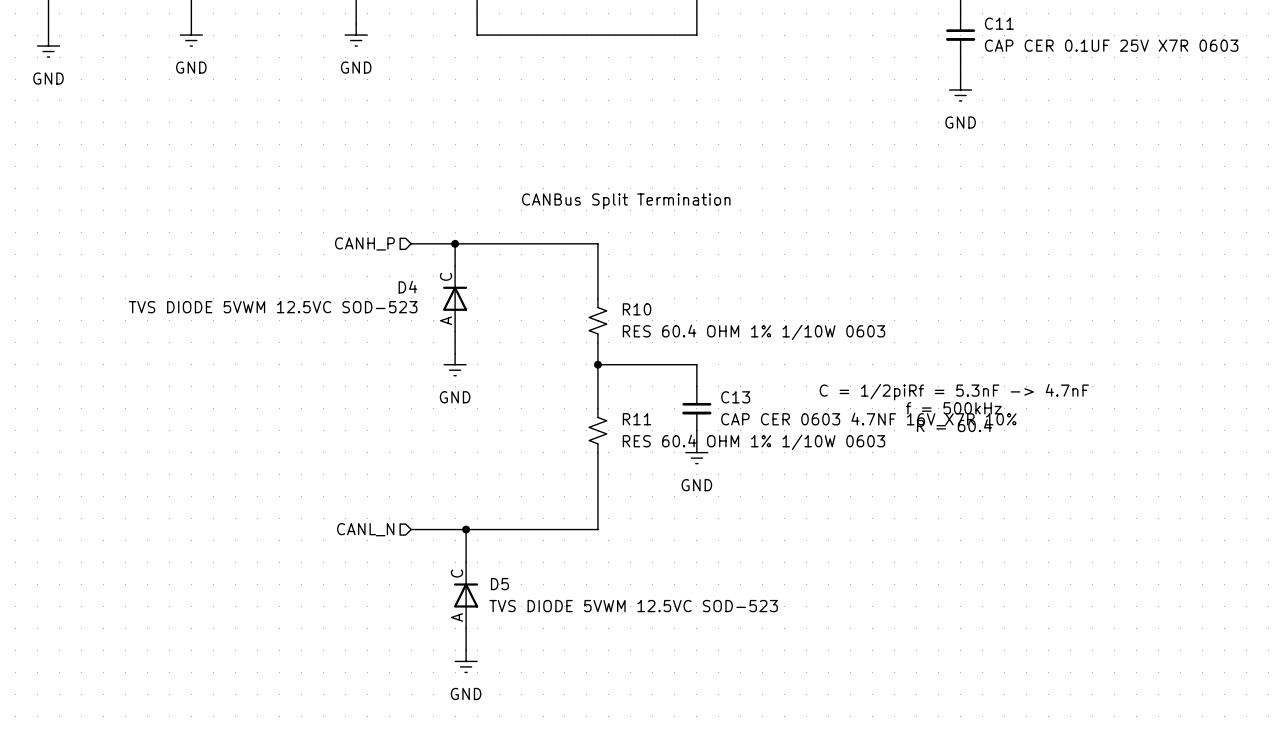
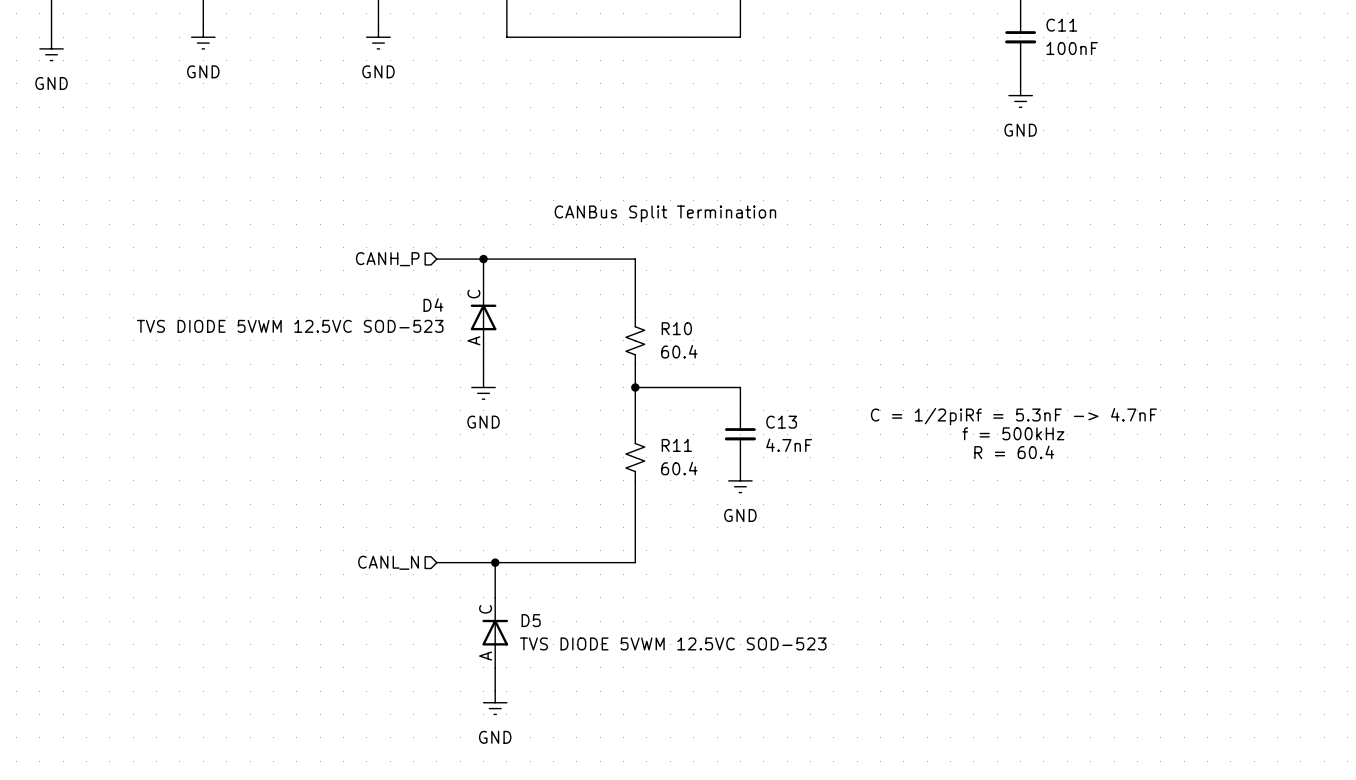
C11 value: CAP CER 0.1UF 25V X7R 0603 (1111, 45) -> 100nF (1072, 48)
R10 value: RES 60.4 OHM 1% 1/10W 0603 (753, 332) -> 60.4 (679, 351)
C13 value: CAP CER 0603 4.7NF 16V X7R 10% (868, 419) -> 4.7nF (789, 445)
R11 value: RES 60.4 OHM 1% 1/10W 0603 (753, 442) -> 60.4 (679, 468)

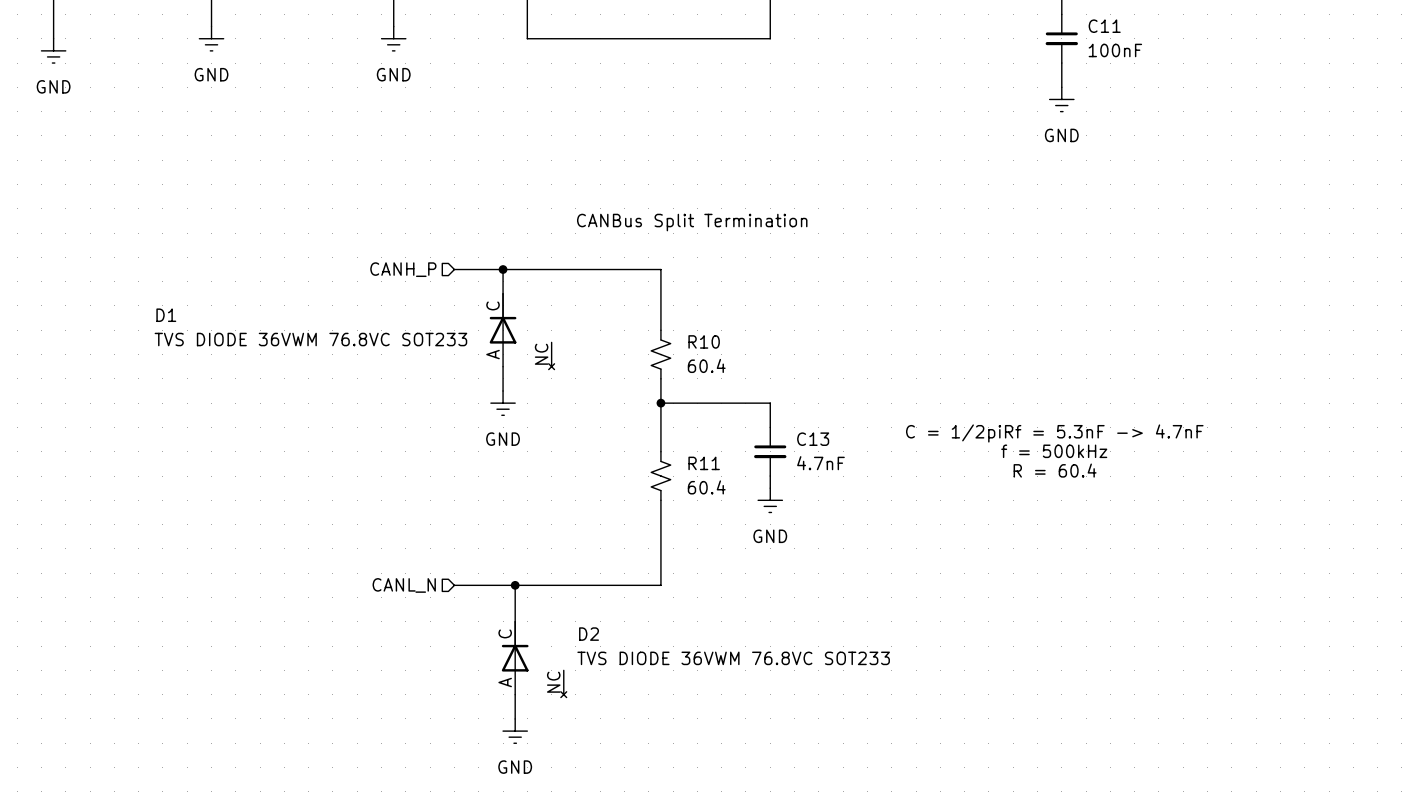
D4: TVS DIODE 5VWM 12.5VC SOD-523 (483, 317) -> none
D1: none -> TVS DIODE 36VWM 76.8VC SOT233 (522, 331)
D5: TVS DIODE 5VWM 12.5VC SOD-523 (495, 632) -> none
D2: none -> TVS DIODE 36VWM 76.8VC SOT233 (534, 659)

